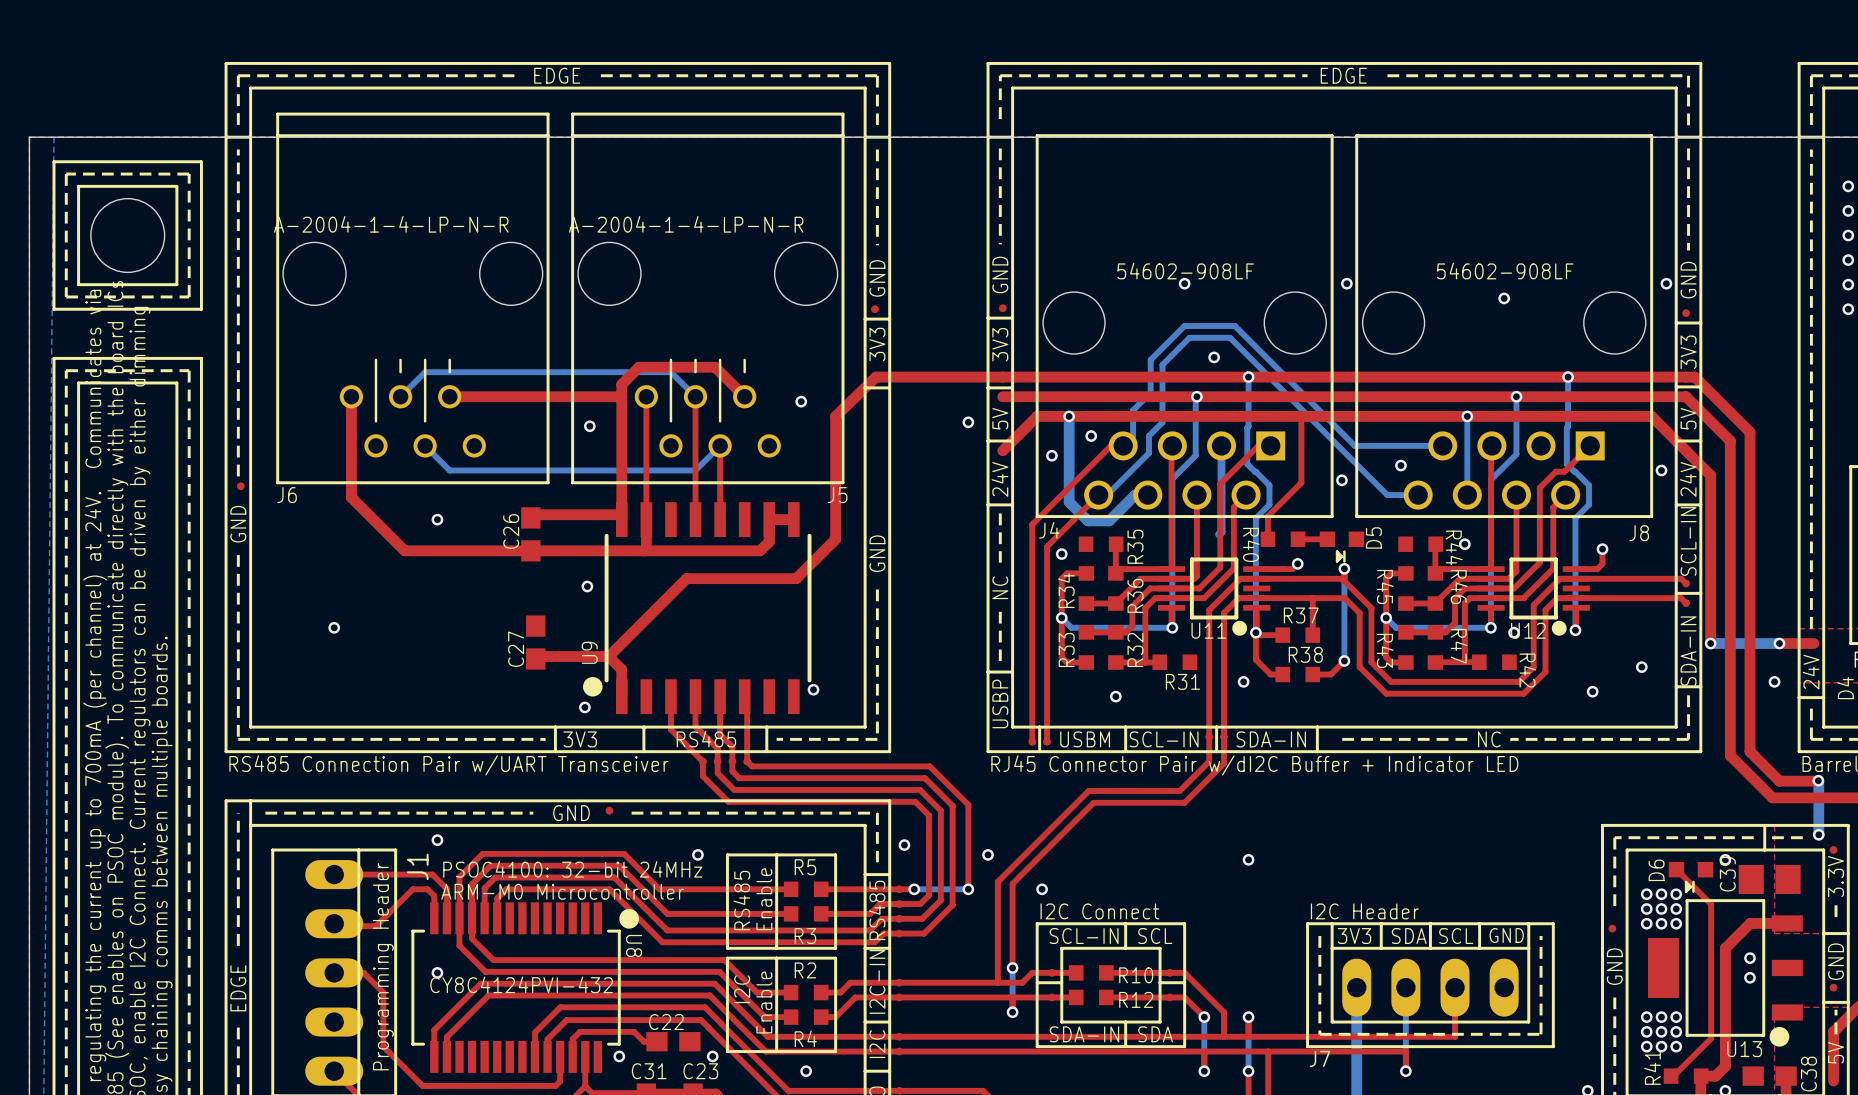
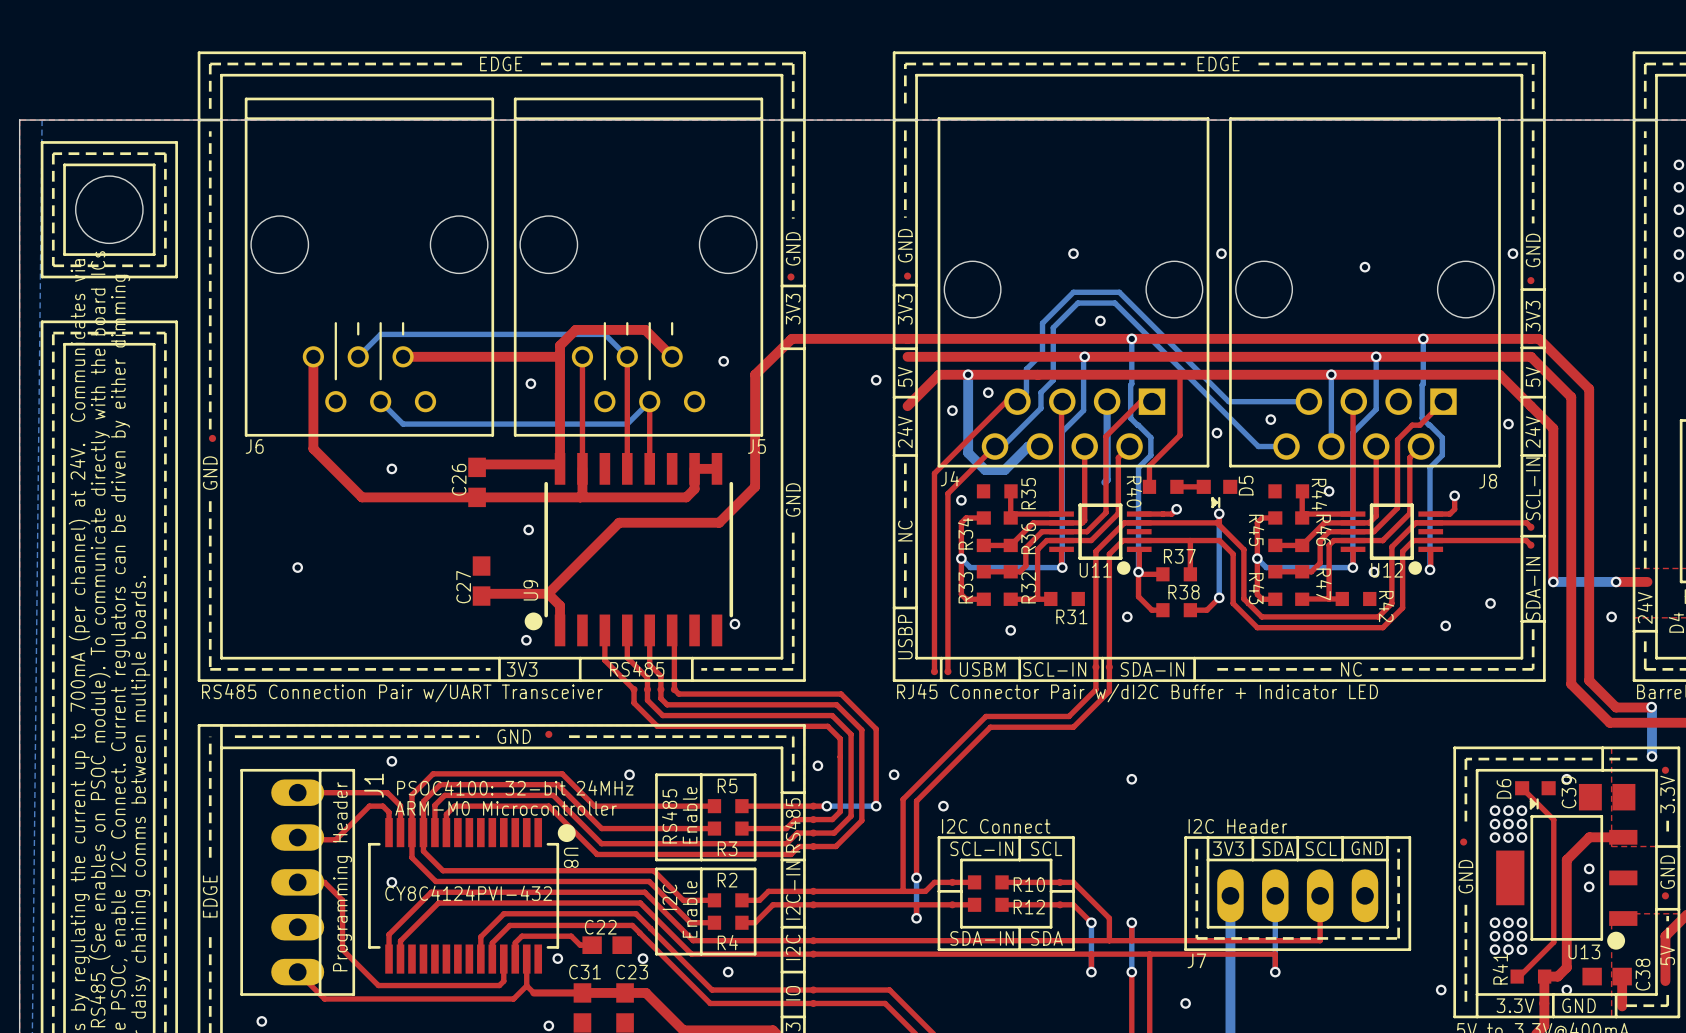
J6 value: A-2004-1-4-LP-N-R (391, 224) -> none
J5 value: A-2004-1-4-LP-N-R (686, 224) -> none
J4 value: 54602-908LF (1185, 271) -> none
J8 value: 54602-908LF (1505, 271) -> none

